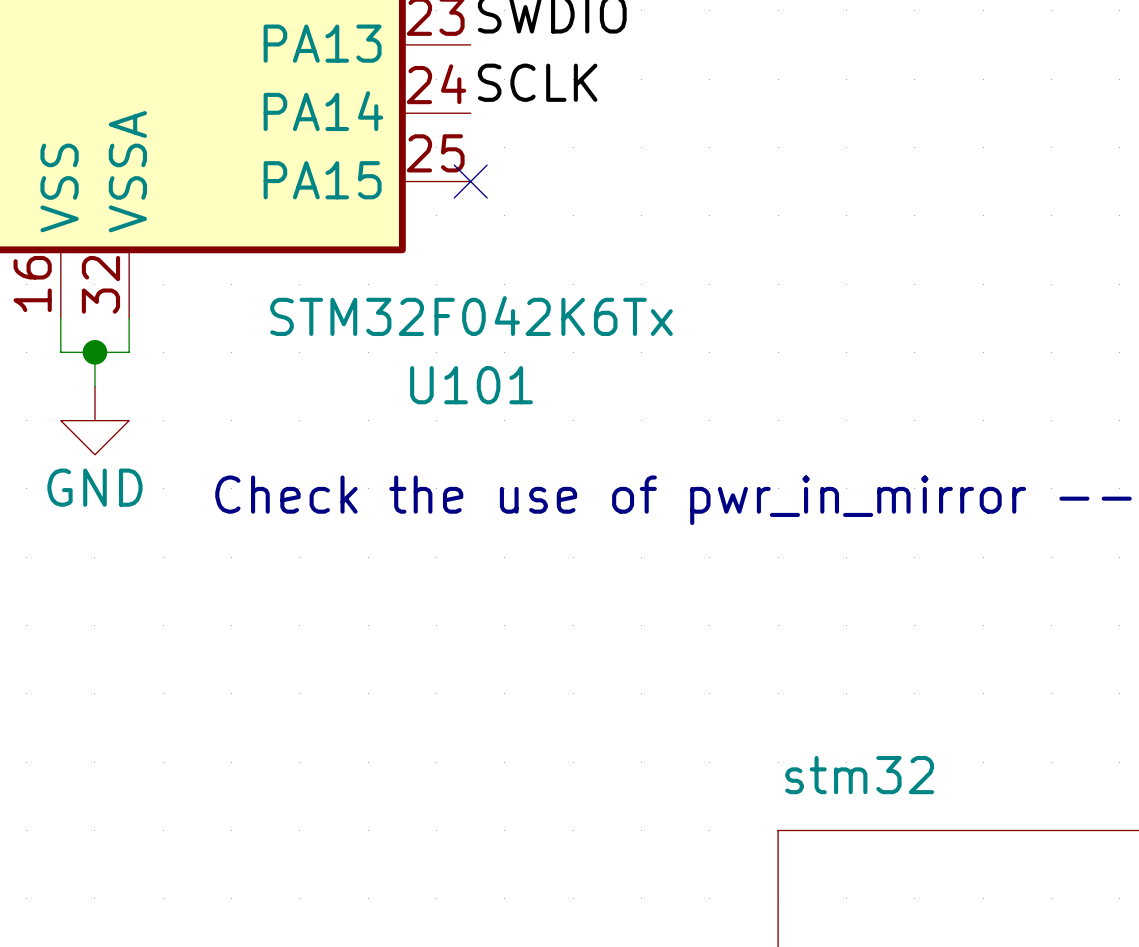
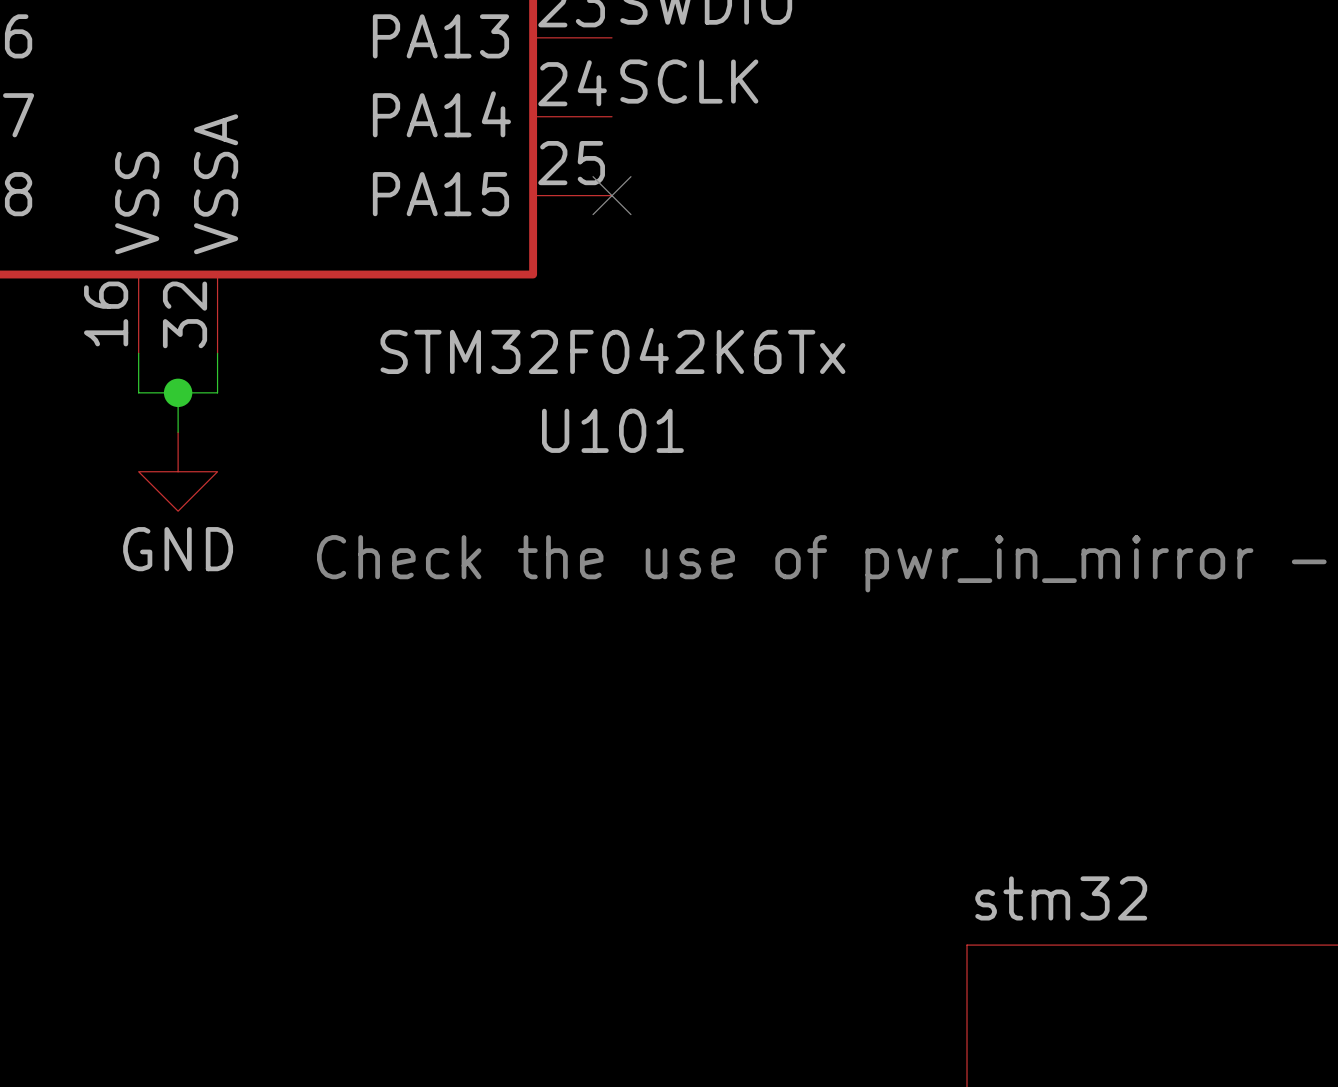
sheet stm32 name position: stm32 (859, 775) -> stm32 (1061, 898)

